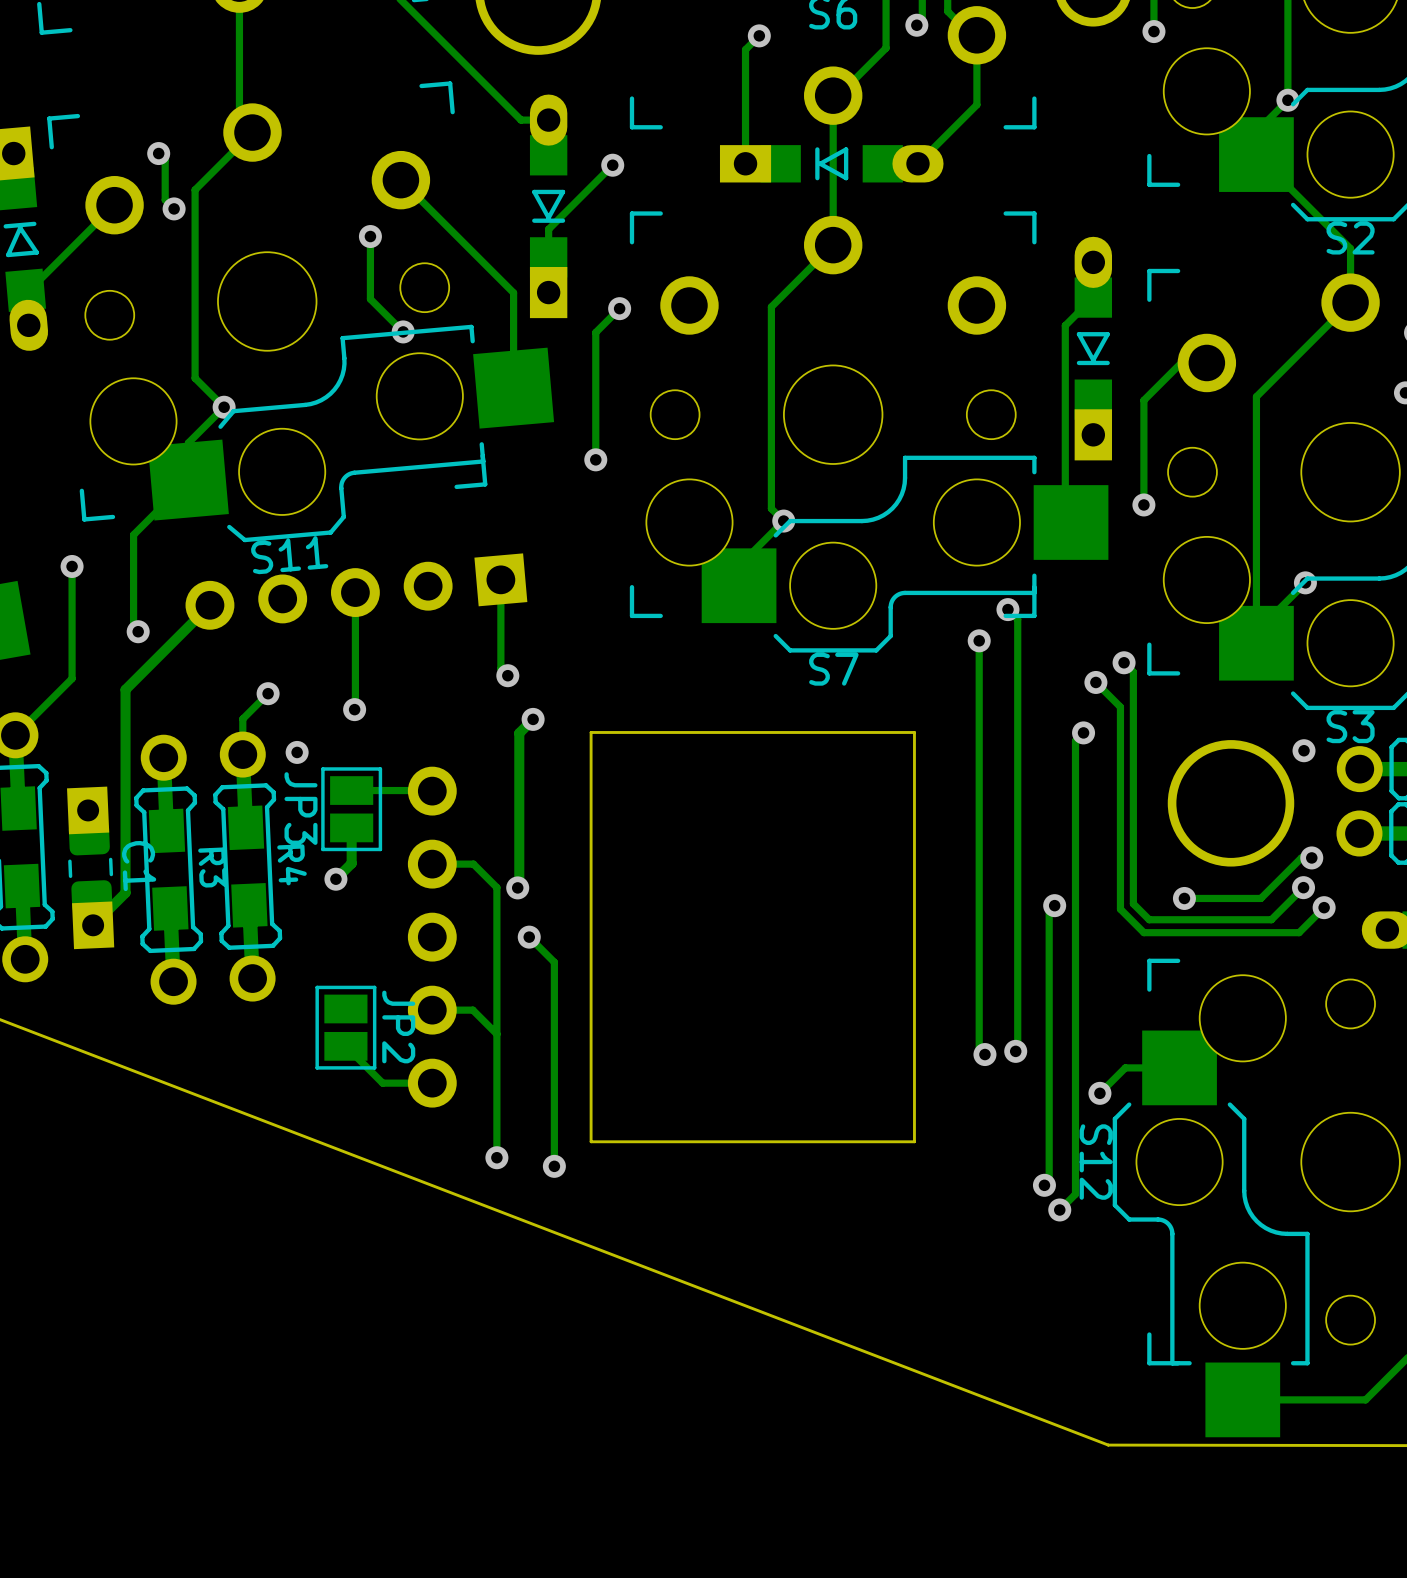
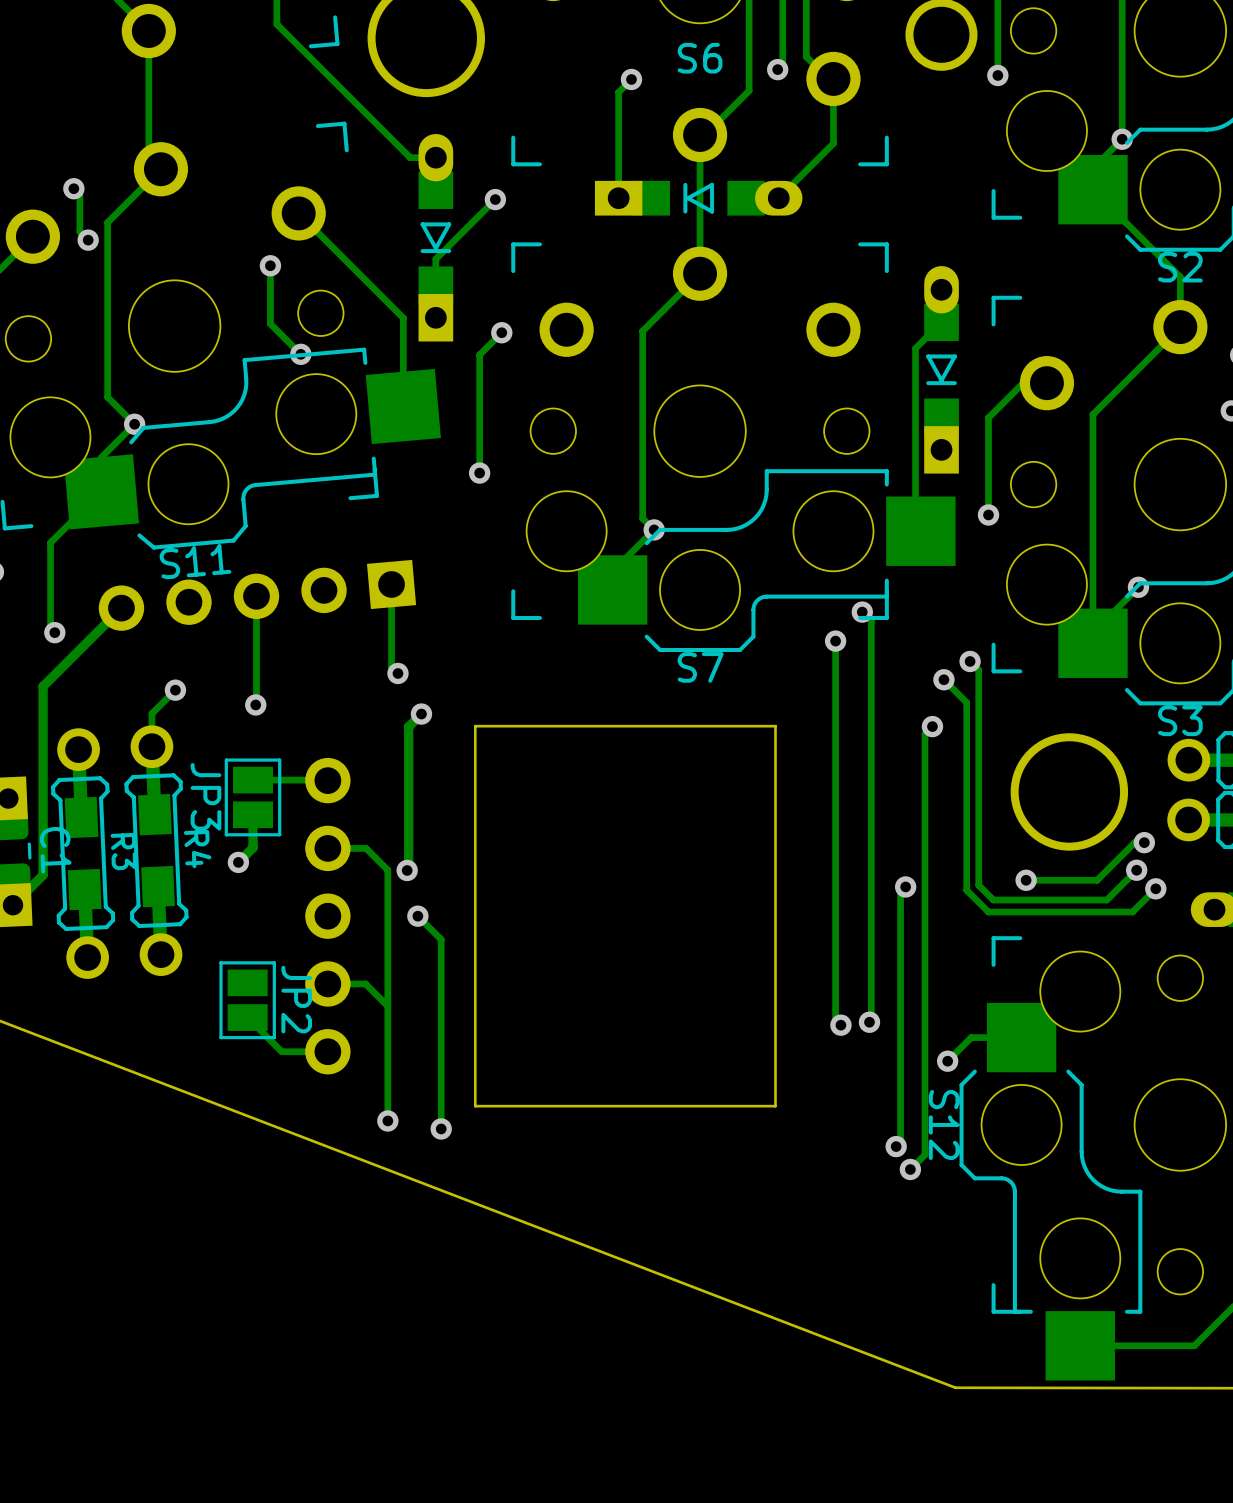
via: (1304, 750) -> none
via: (297, 752) -> none

